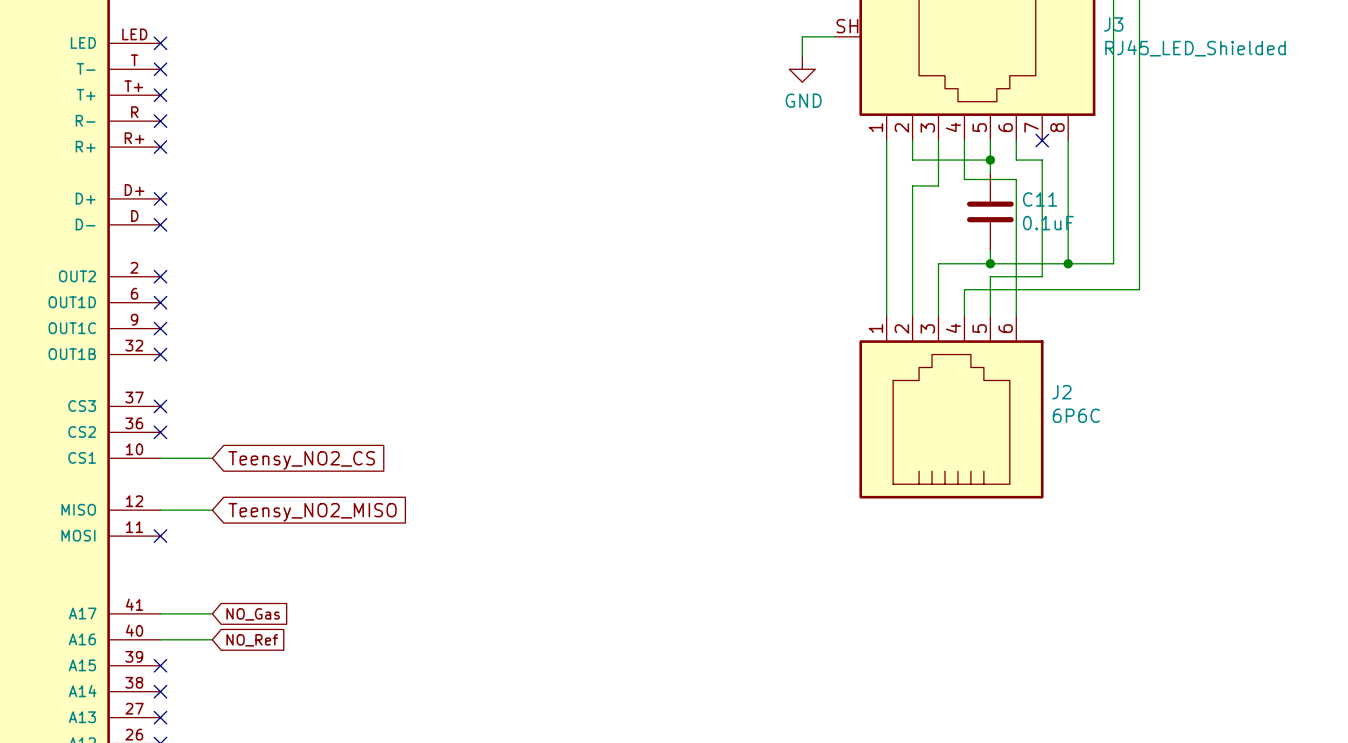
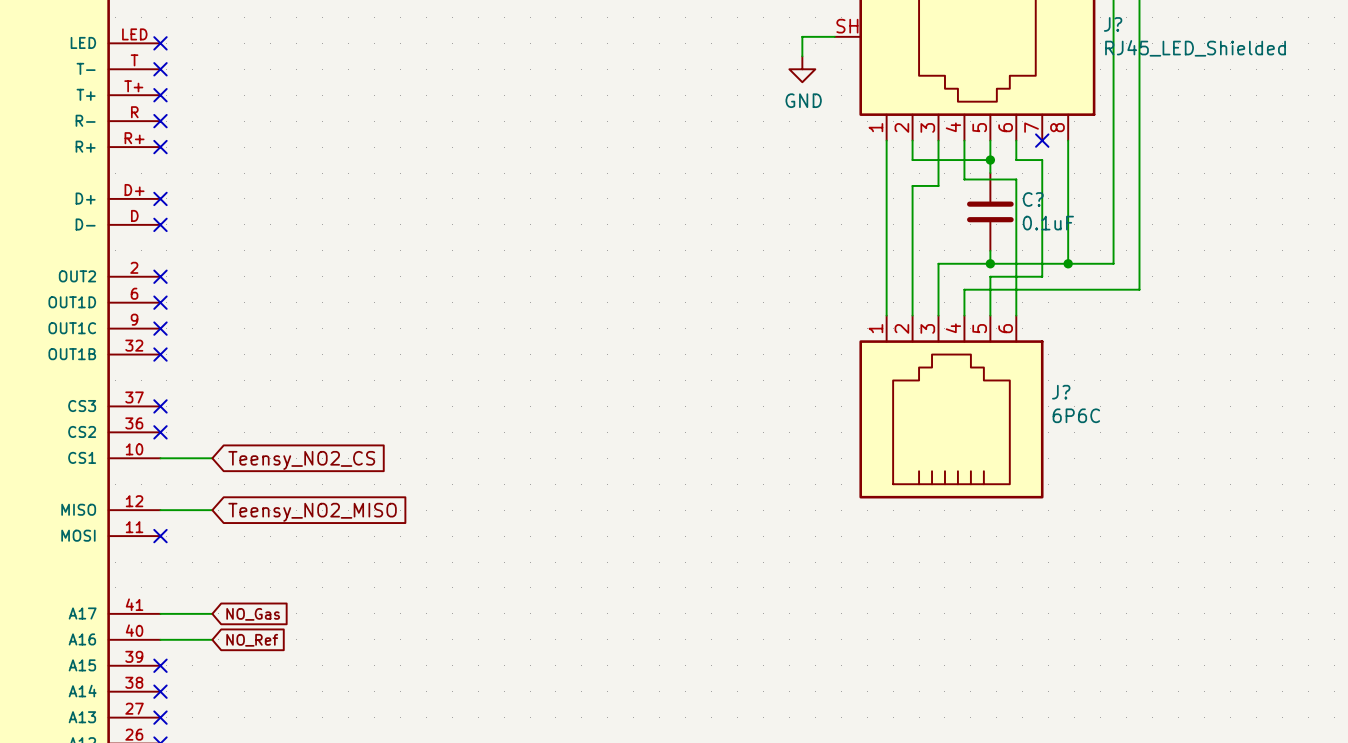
J3 name: J3 (1113, 24) -> J? (1113, 24)
C11 name: C11 (1040, 199) -> C? (1033, 199)
J2 name: J2 (1061, 392) -> J? (1061, 392)

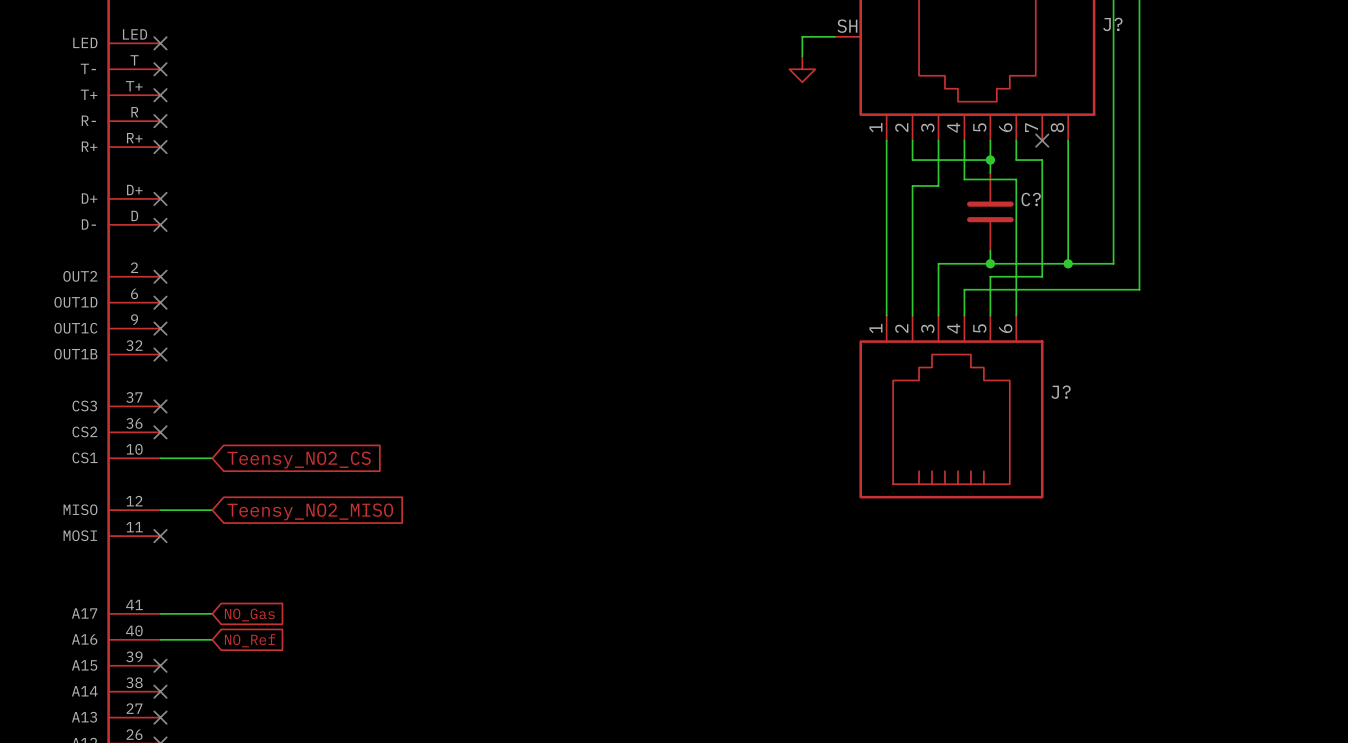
J? value: RJ45_LED_Shielded (1195, 48) -> none
power symbol text: GND (803, 100) -> none
C? value: 0.1uF (1048, 223) -> none
J? value: 6P6C (1076, 415) -> none

